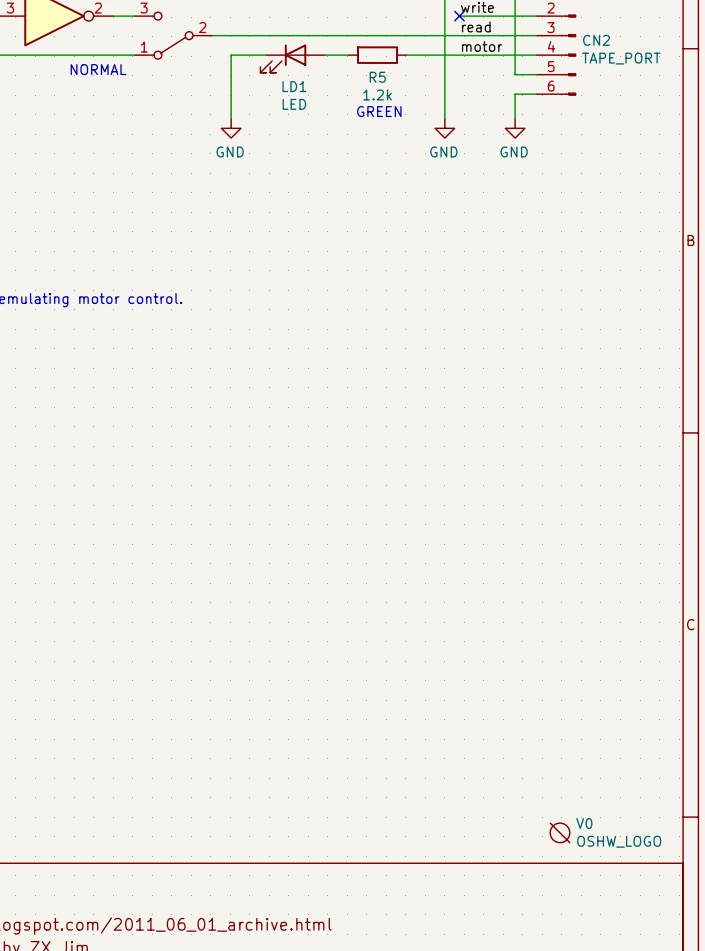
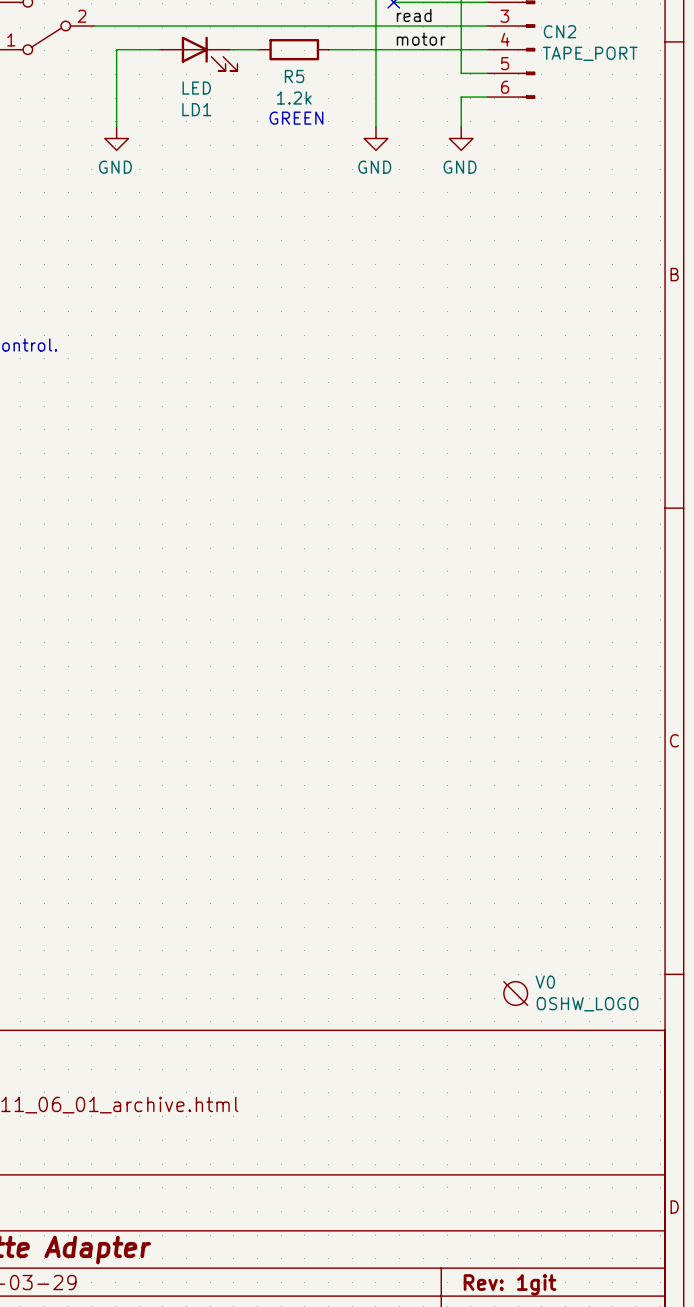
LD1 flip: as is (283, 58) -> left-right (209, 53)
LD1 name position: LD1 (294, 86) -> LD1 (196, 109)
LD1 value position: LED (294, 104) -> LED (196, 88)

